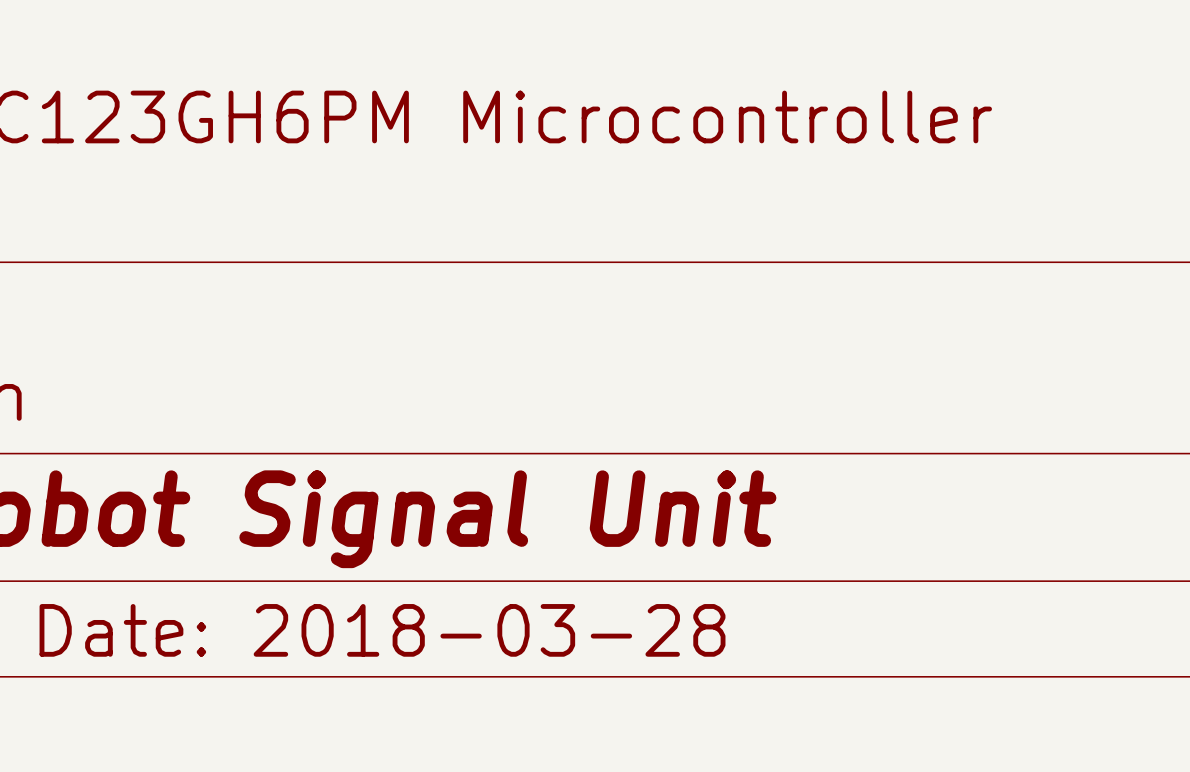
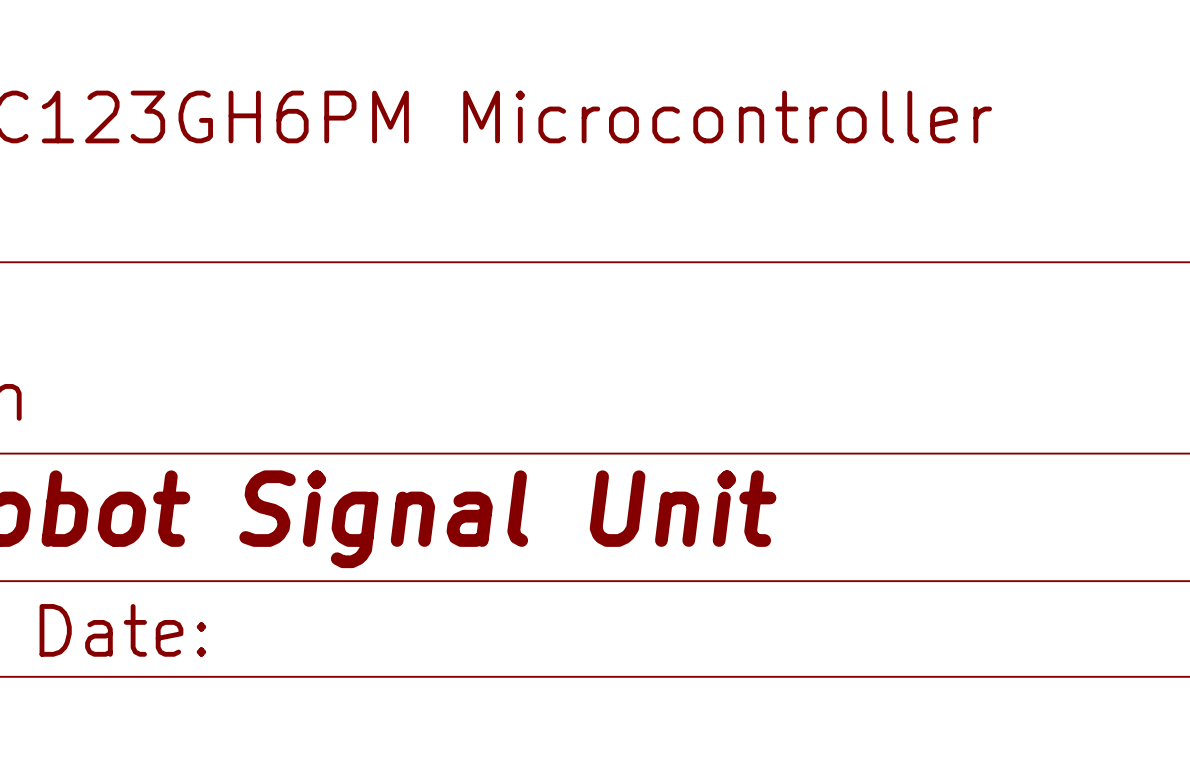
title block: Date: 2018-03-28 (382, 630) -> Date: (122, 630)

